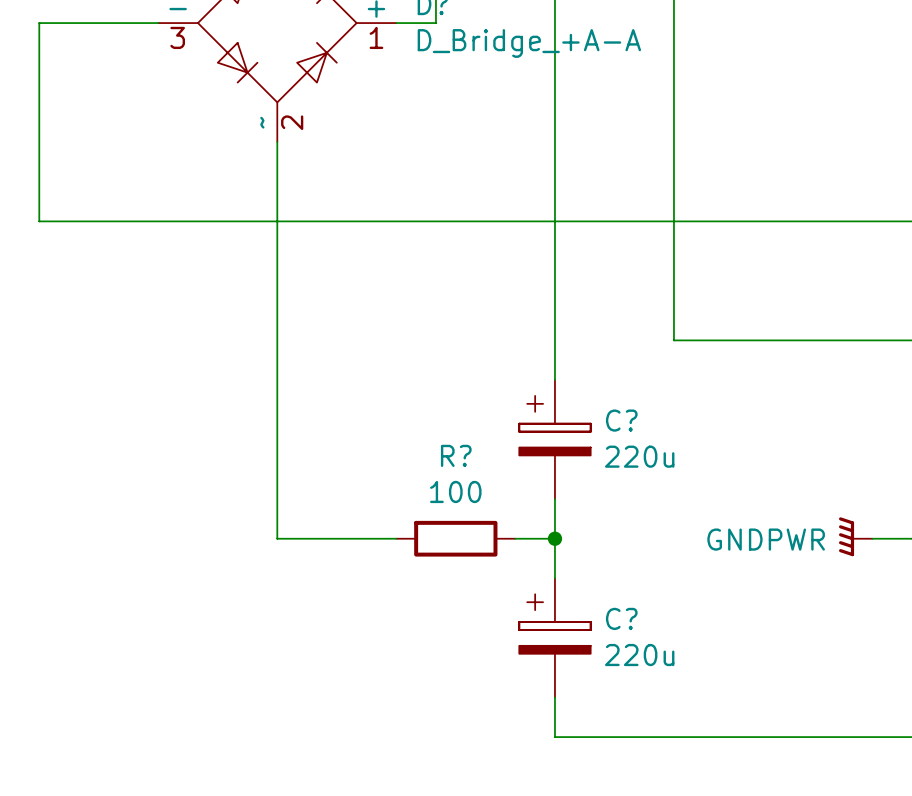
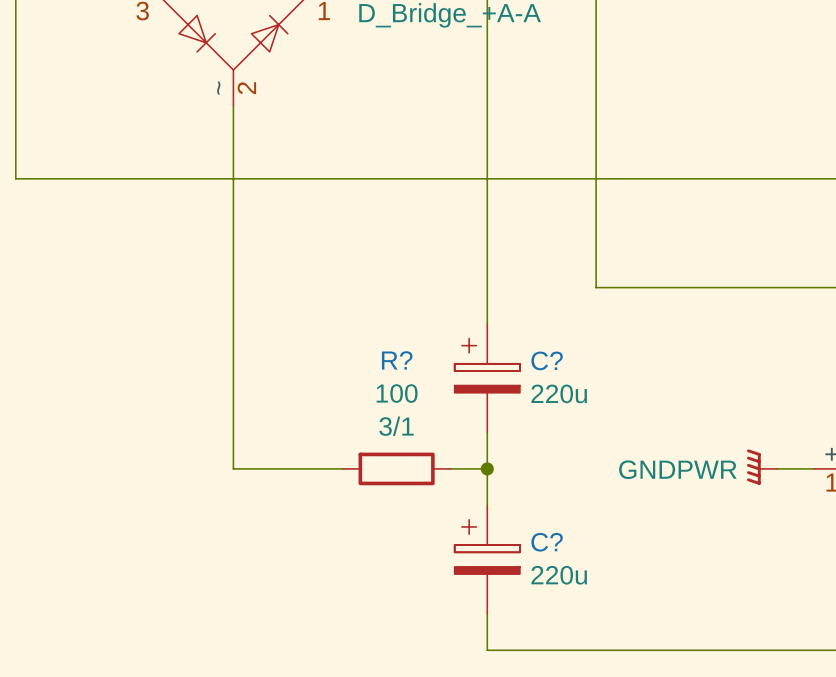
R? name position: R? (456, 455) -> R? (397, 360)
R? value position: 100 (455, 491) -> 100 (397, 393)
R? text: none -> 3/1 (396, 426)

